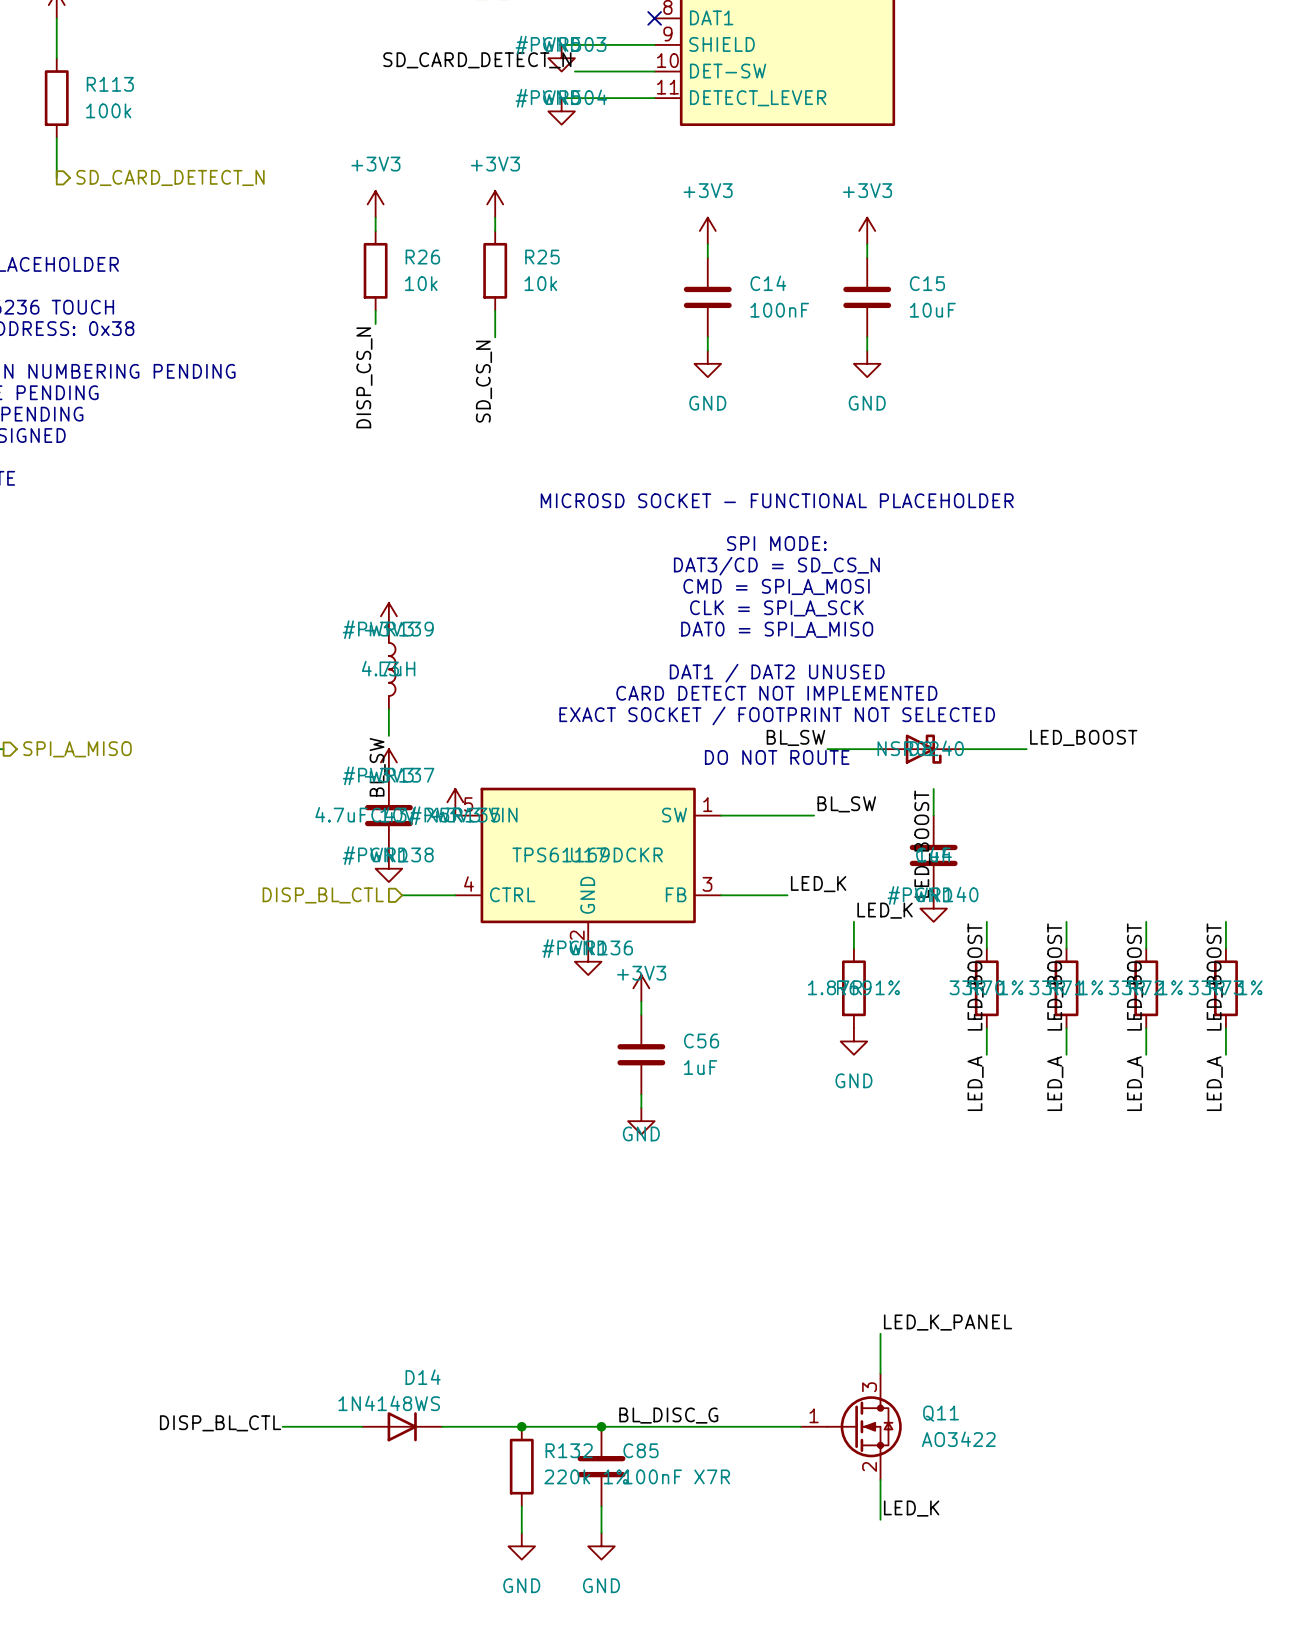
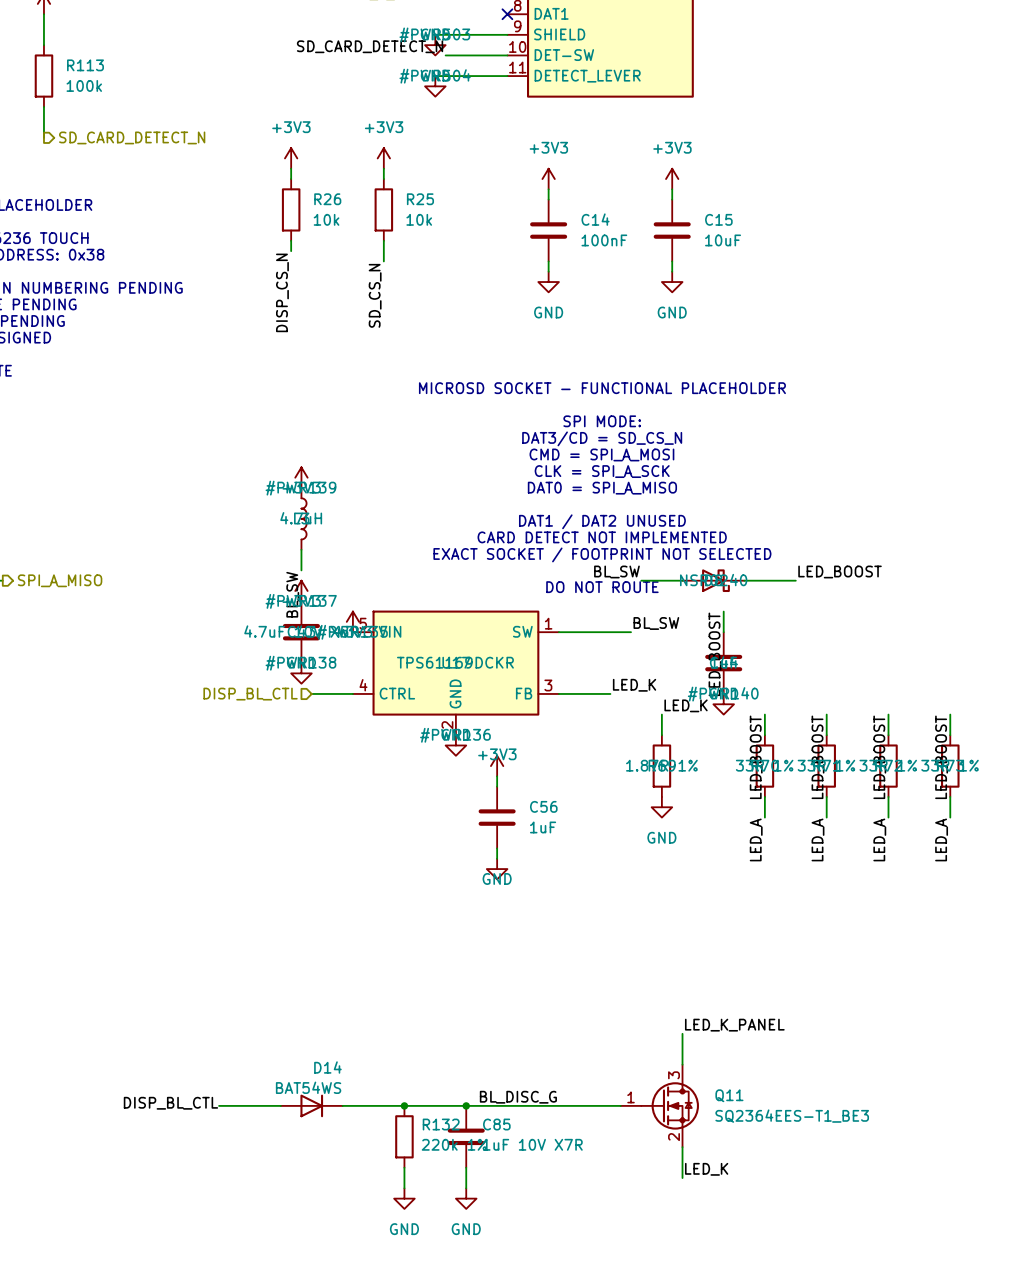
D14 value: 1N4148WS (389, 1403) -> BAT54WS (308, 1087)
Q11 value: AO3422 (958, 1439) -> SQ2364EES-T1_BE3 (792, 1116)
C85 value: 100nF X7R (676, 1476) -> 1uF 10V X7R (532, 1144)

